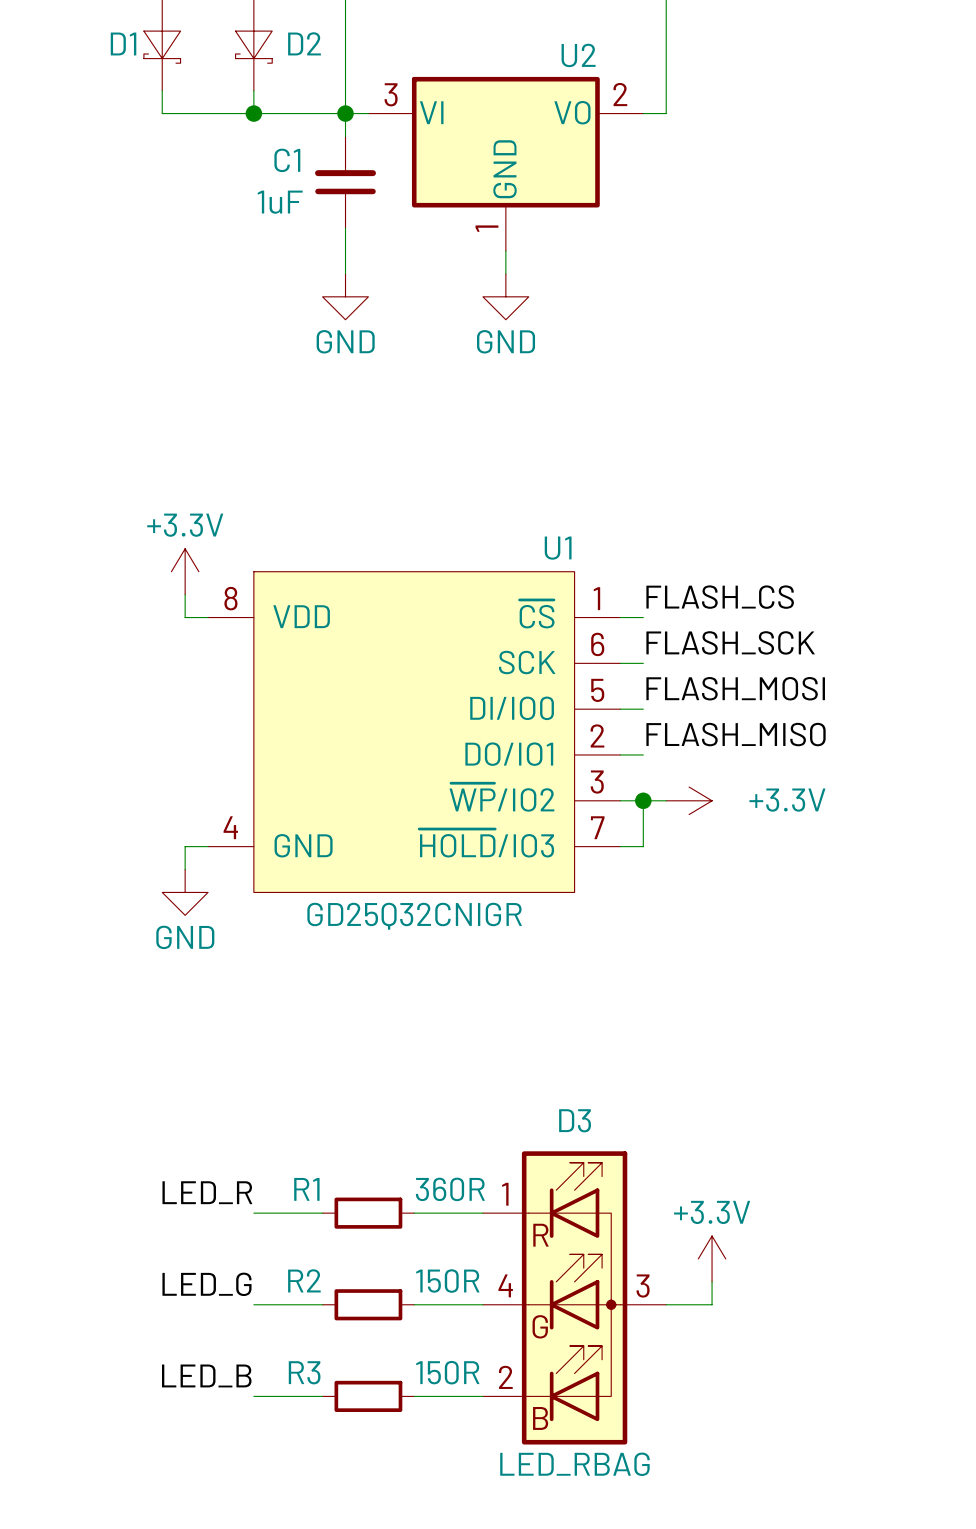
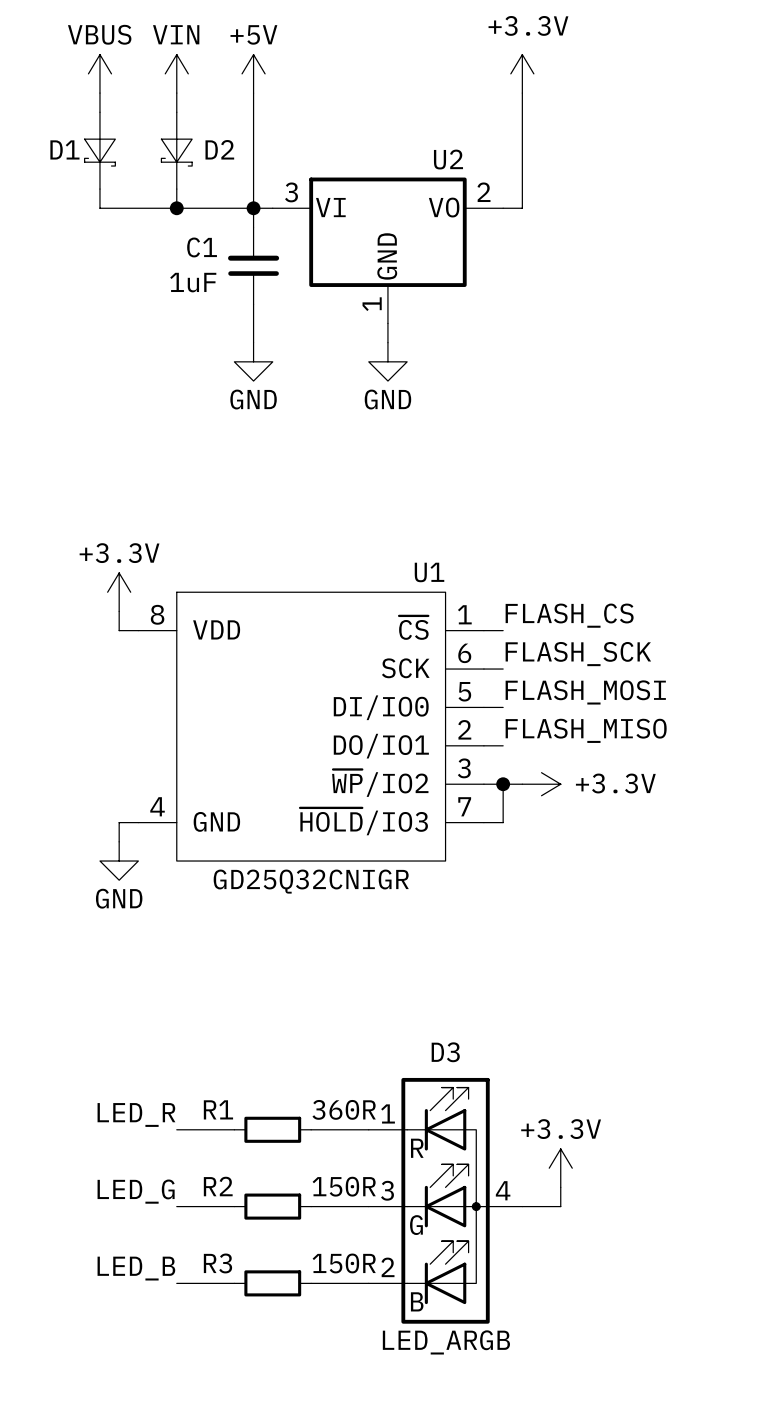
D3 pin number: 4 (505, 1285) -> 3 (387, 1190)
D3 pin number: 3 (643, 1286) -> 4 (503, 1190)
D3 value: LED_RBAG (574, 1464) -> LED_ARGB (446, 1342)

